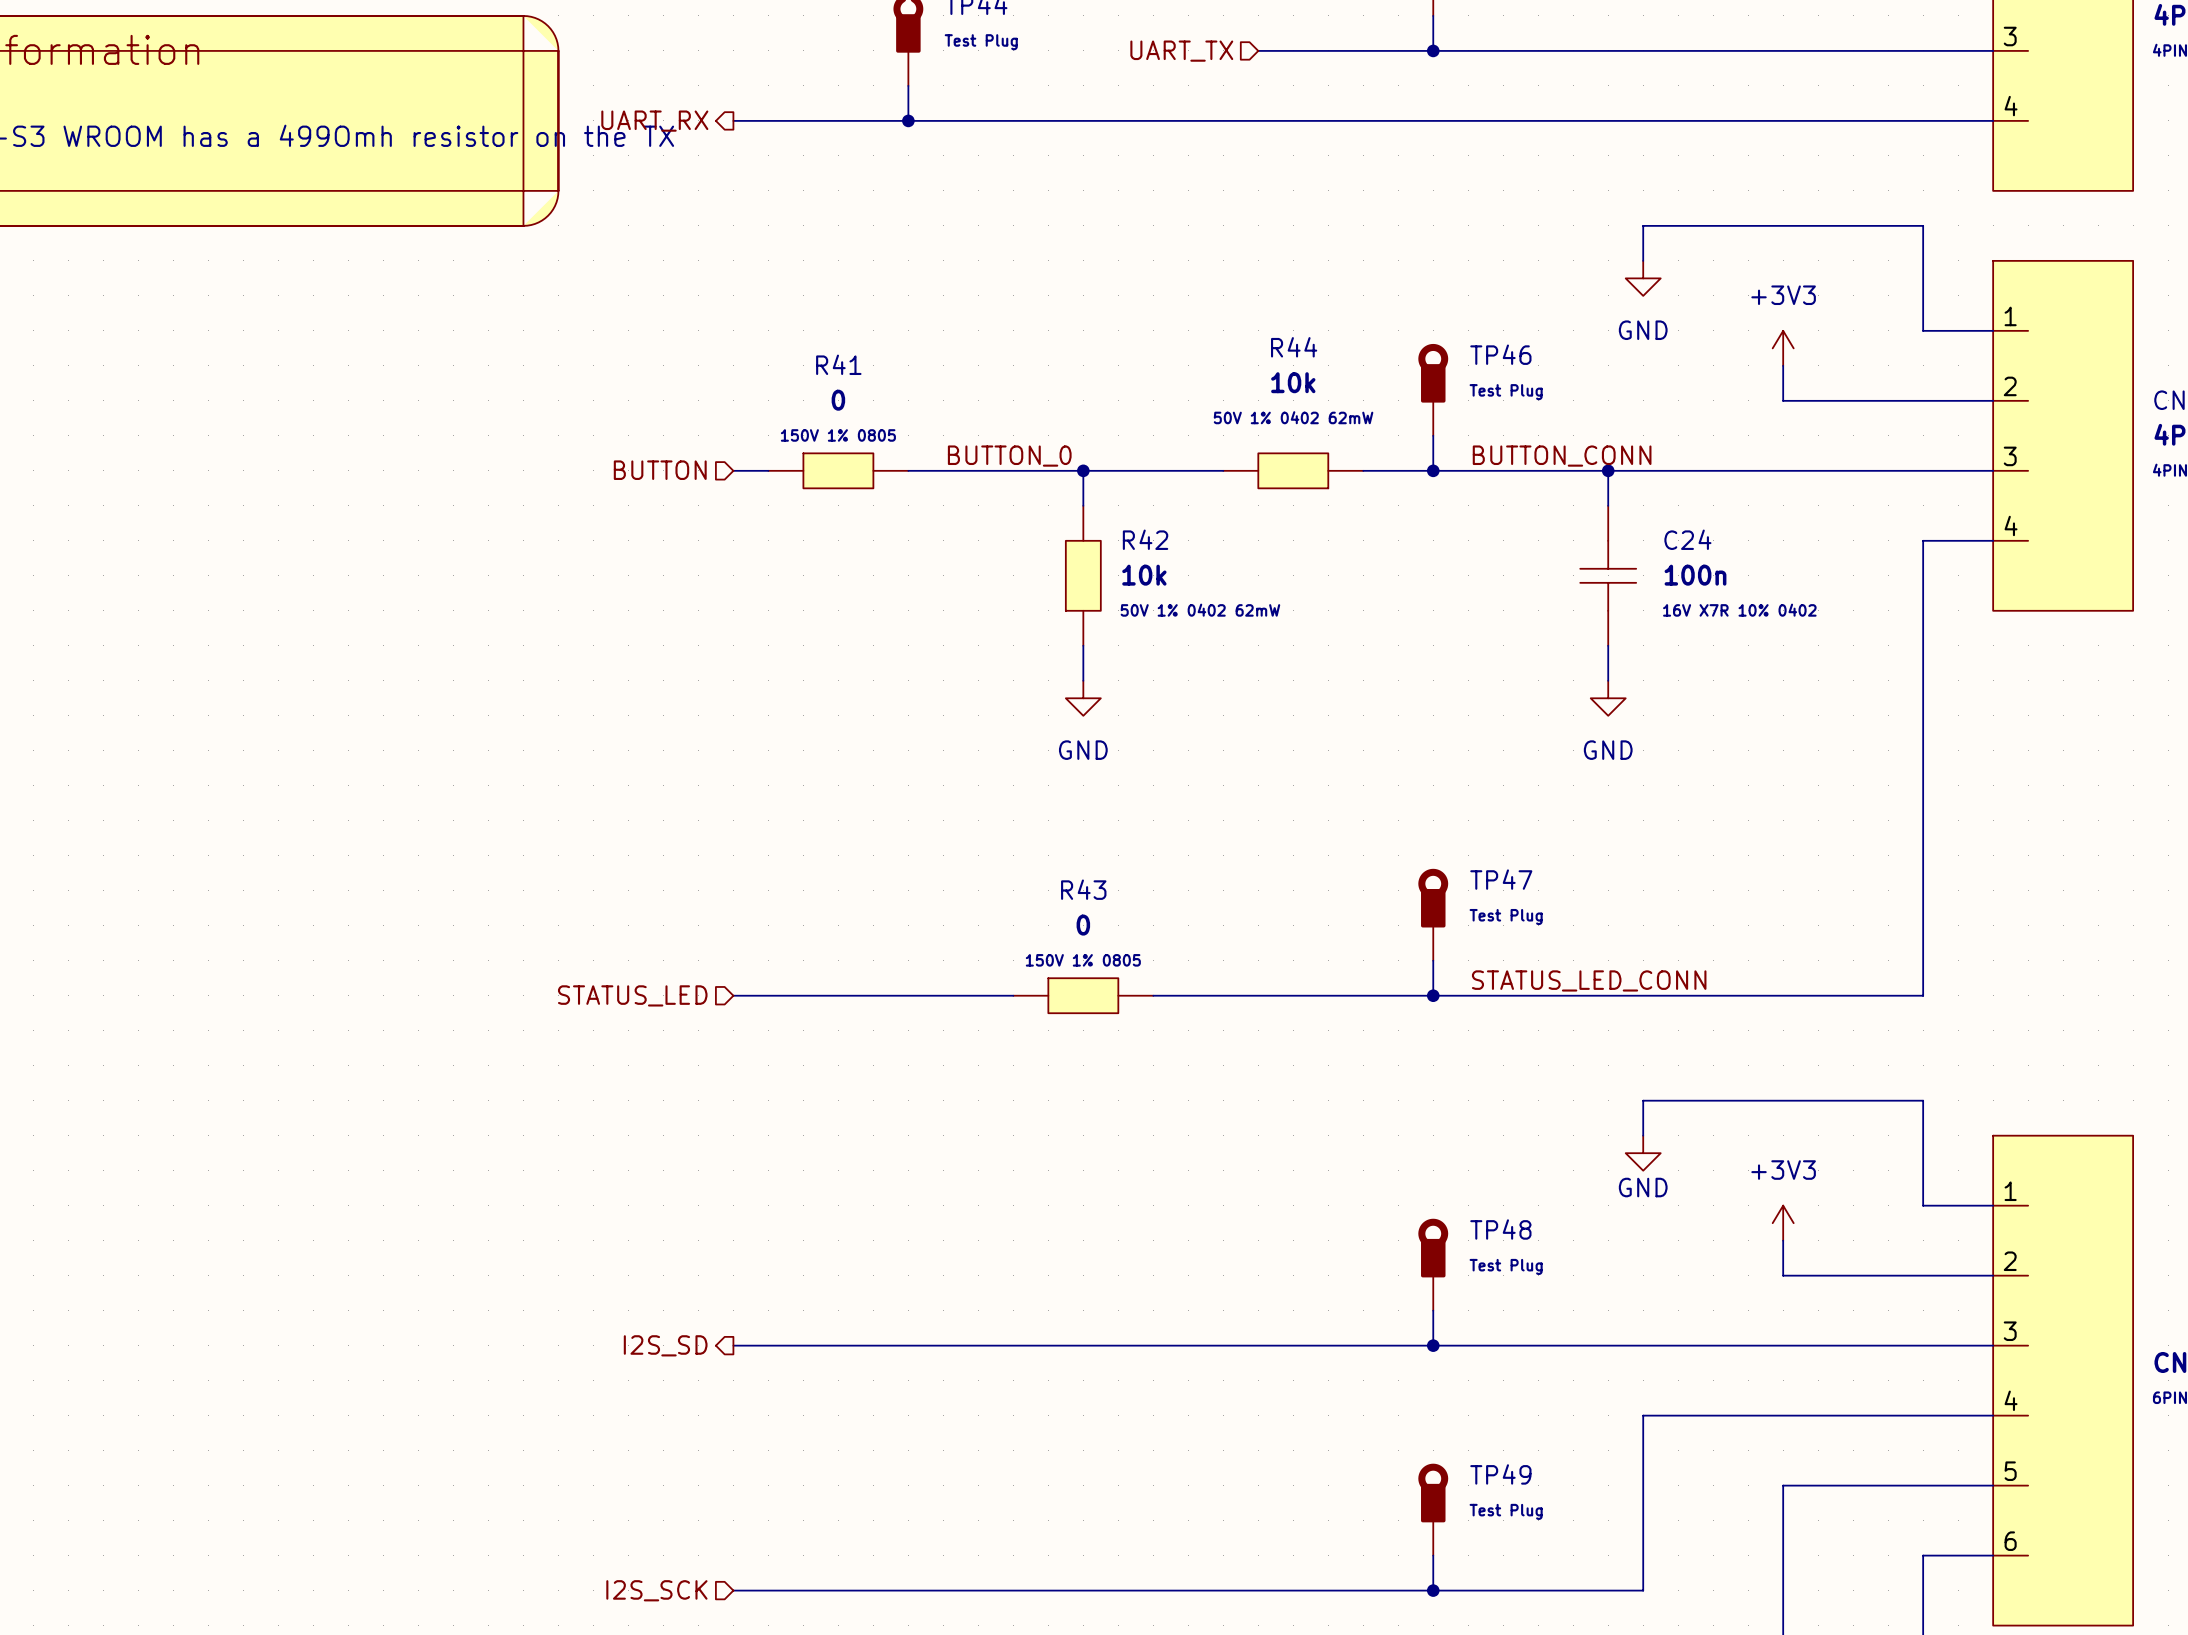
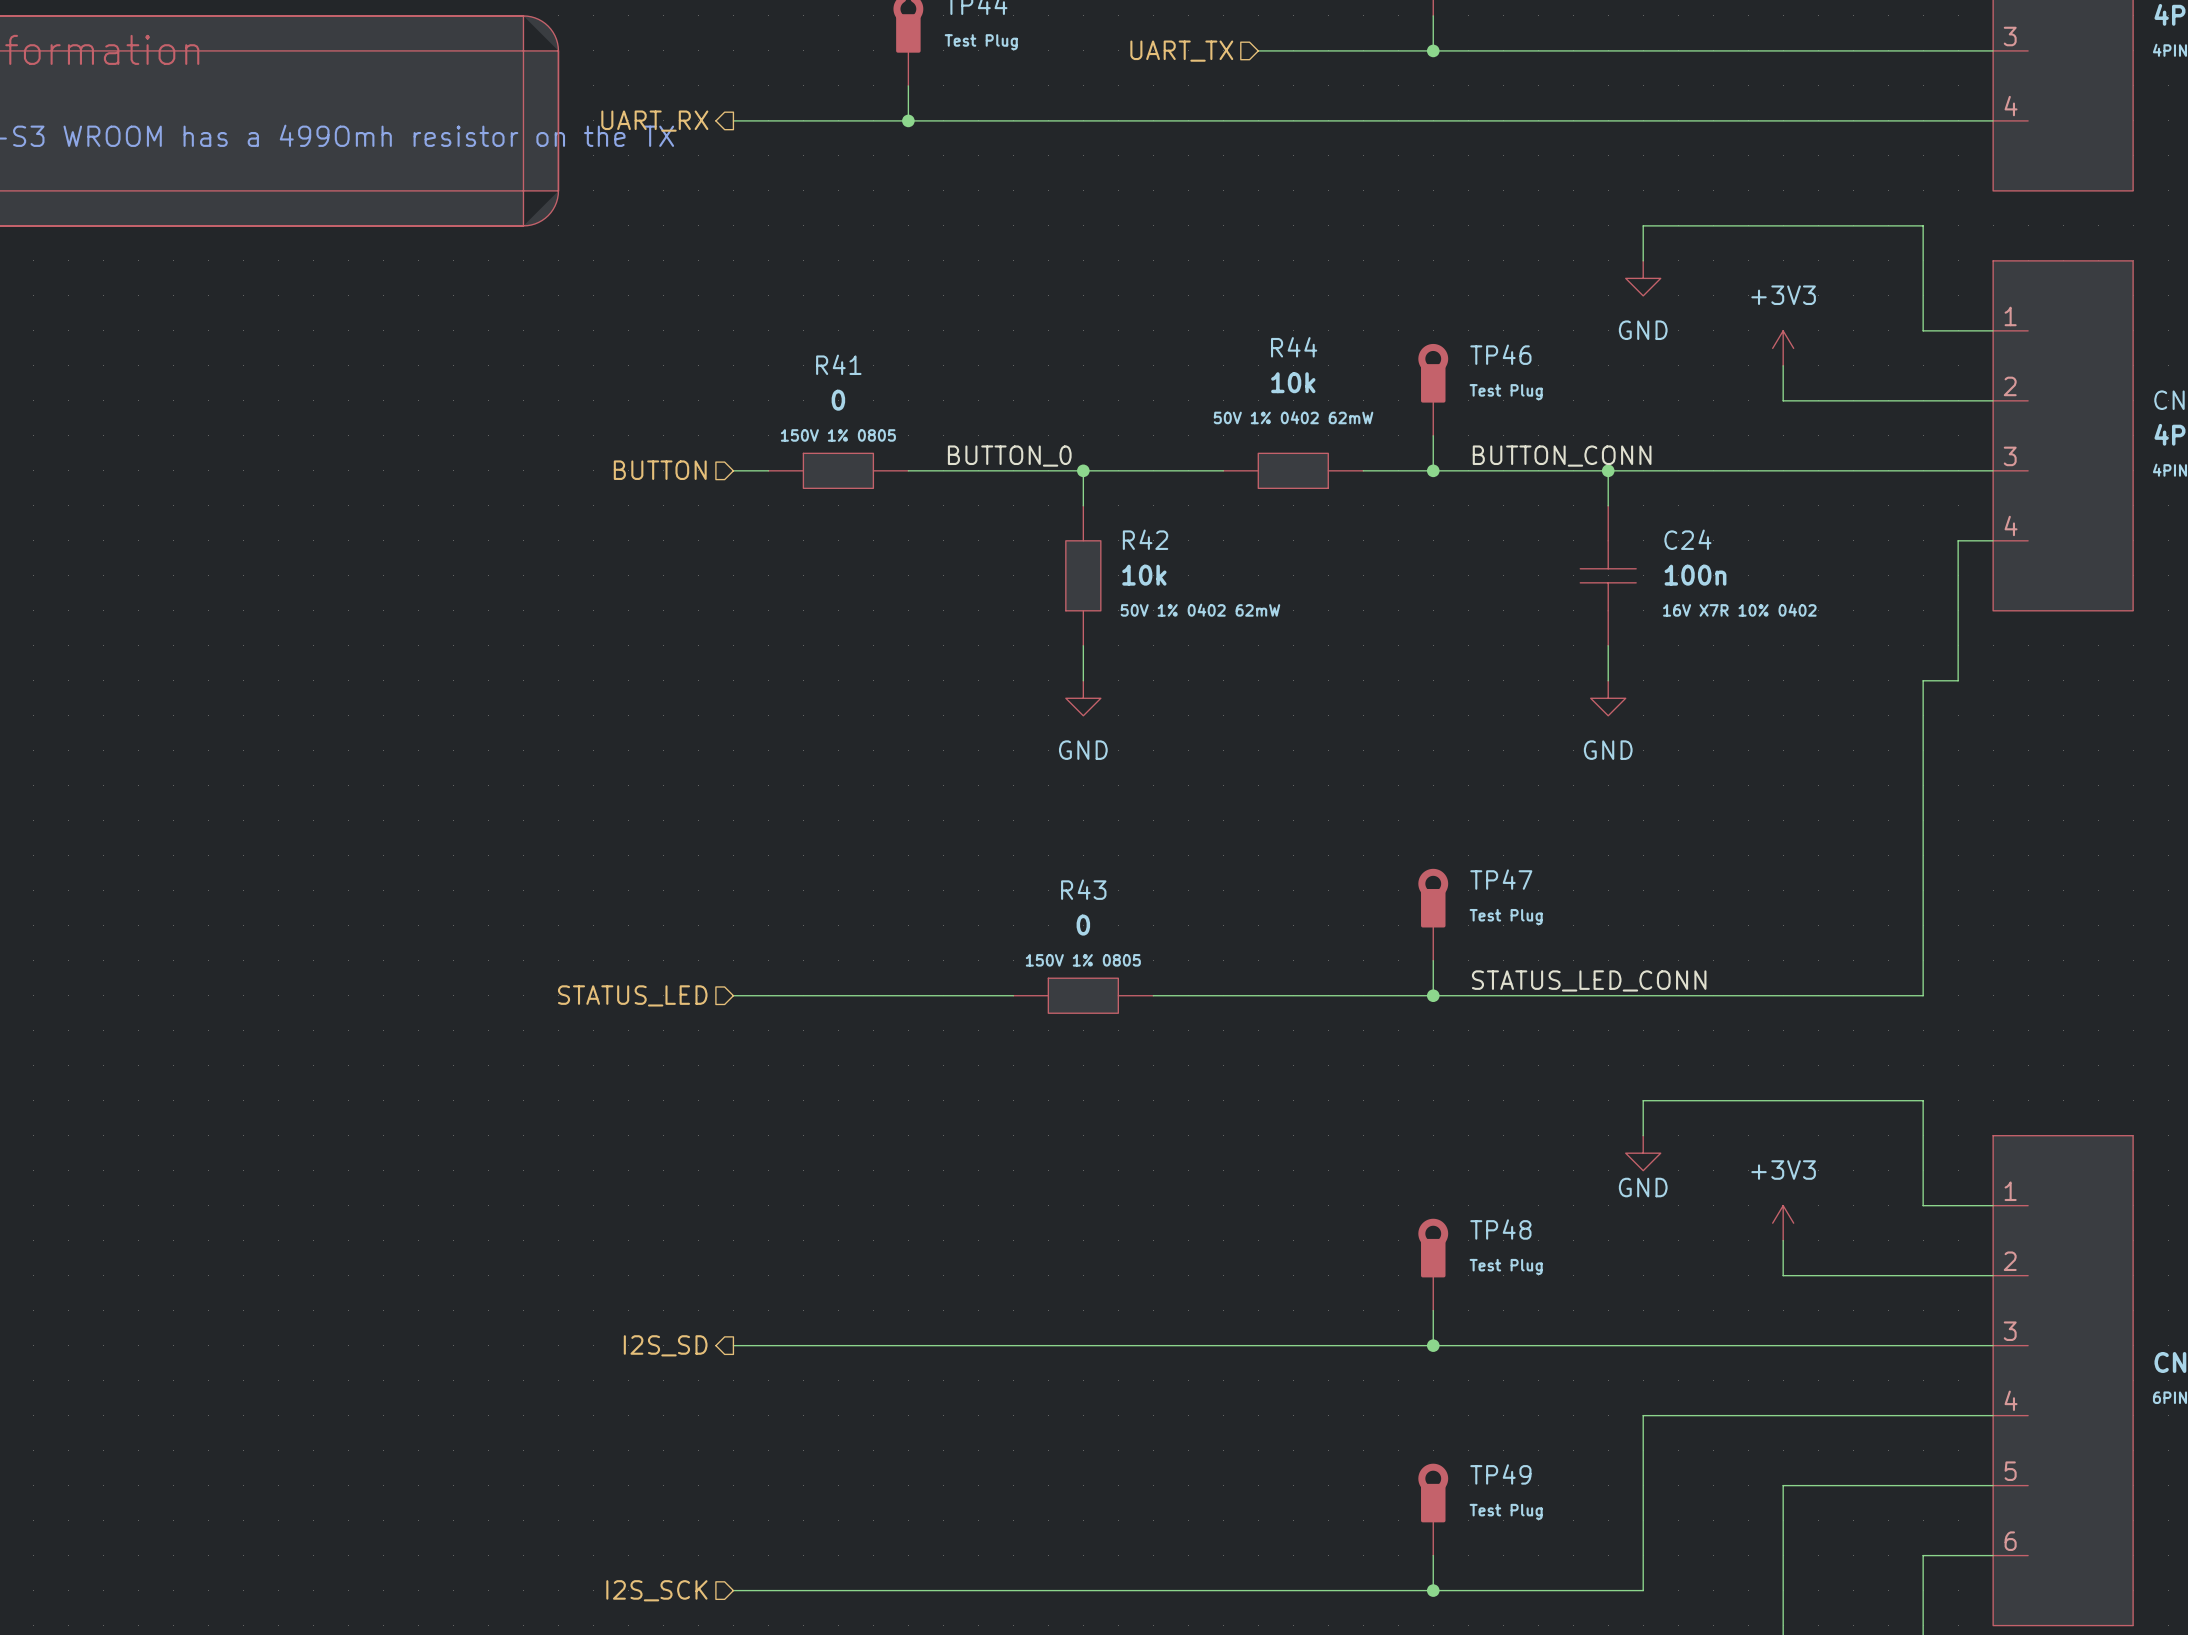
wire: (1958, 540) (1923, 540) (1923, 680) -> (1958, 540) (1958, 680) (1923, 680)

